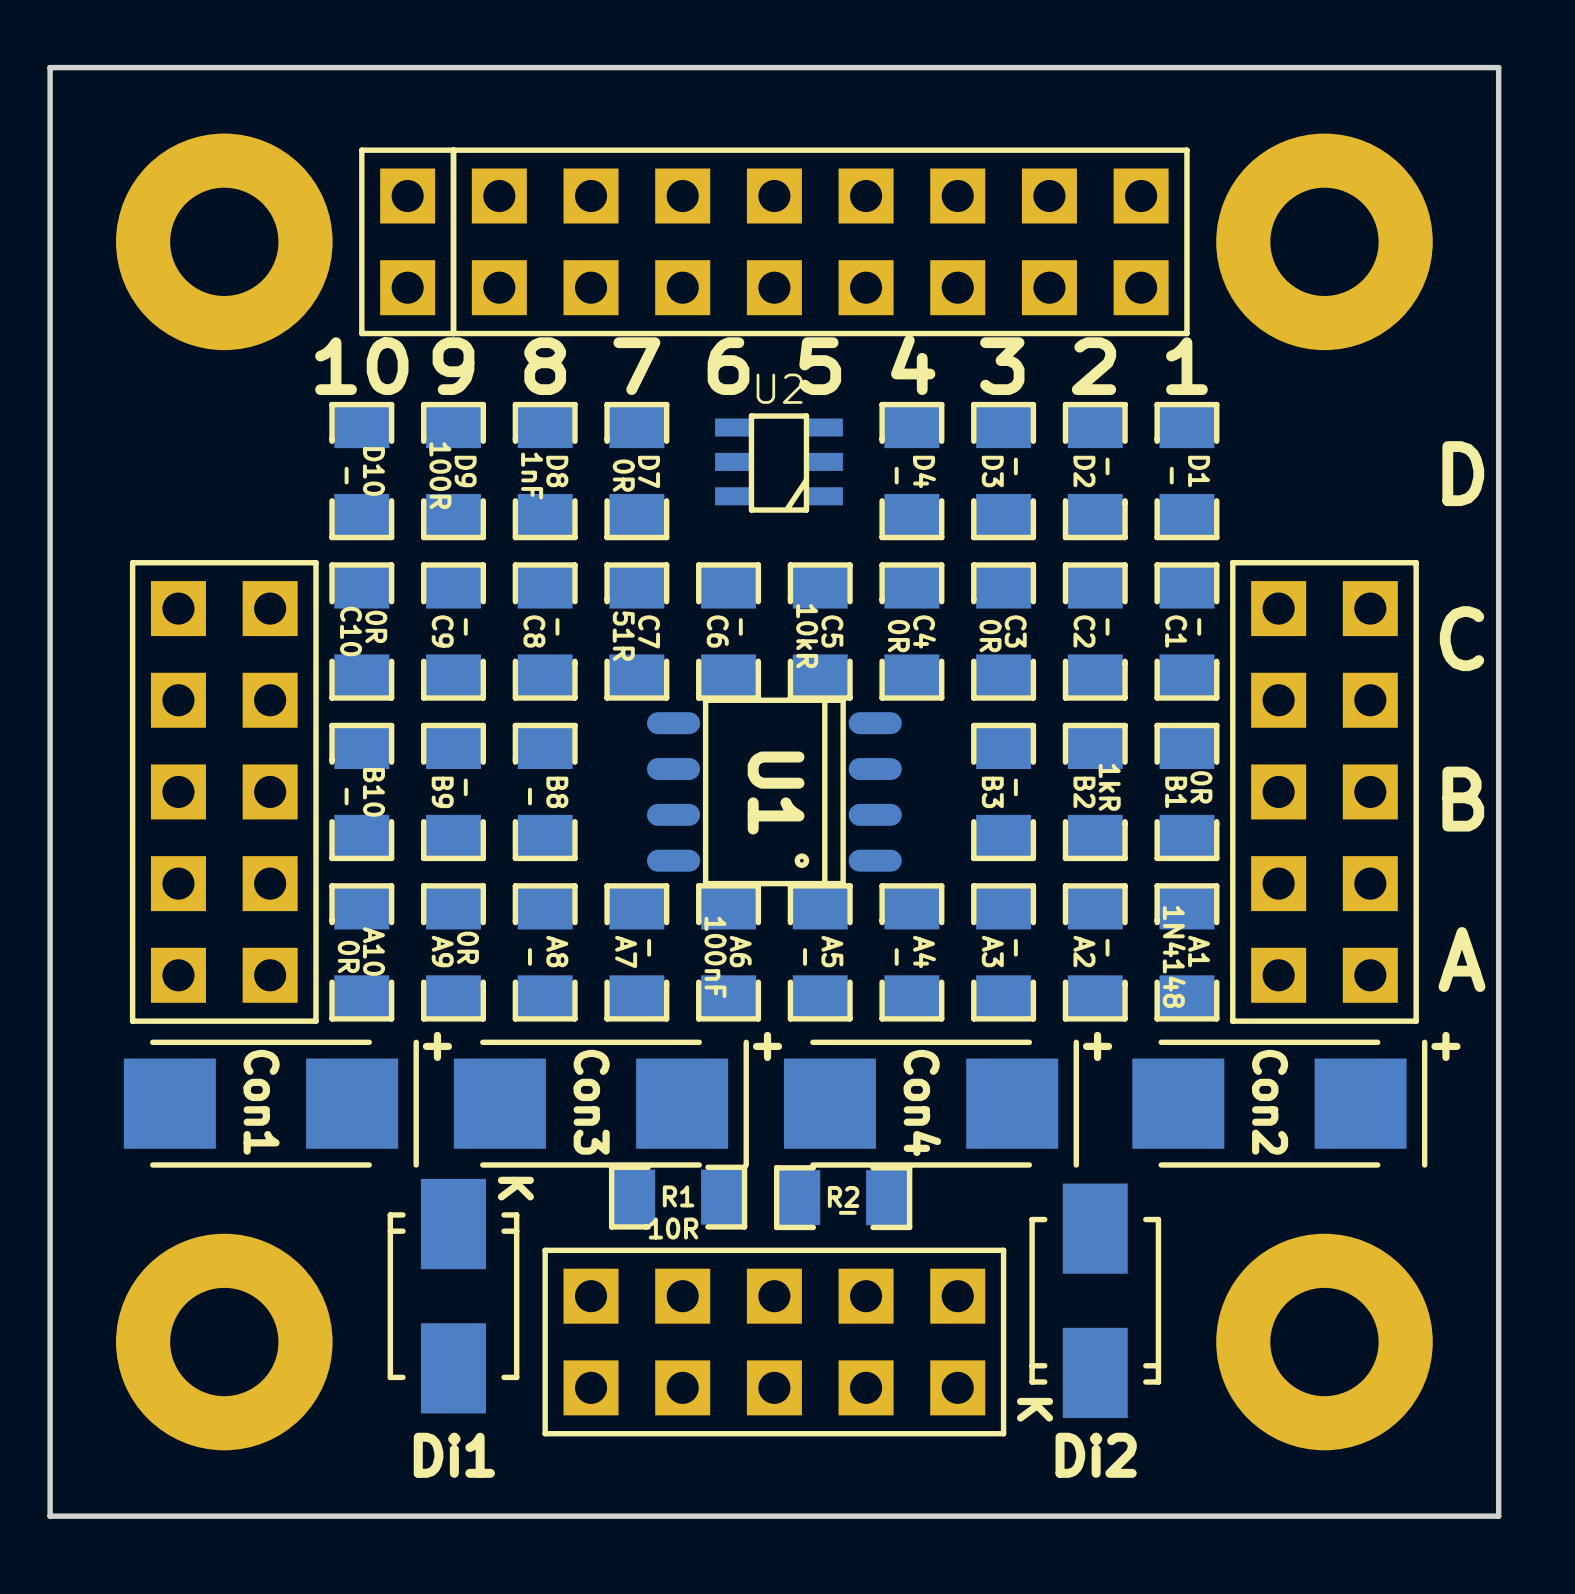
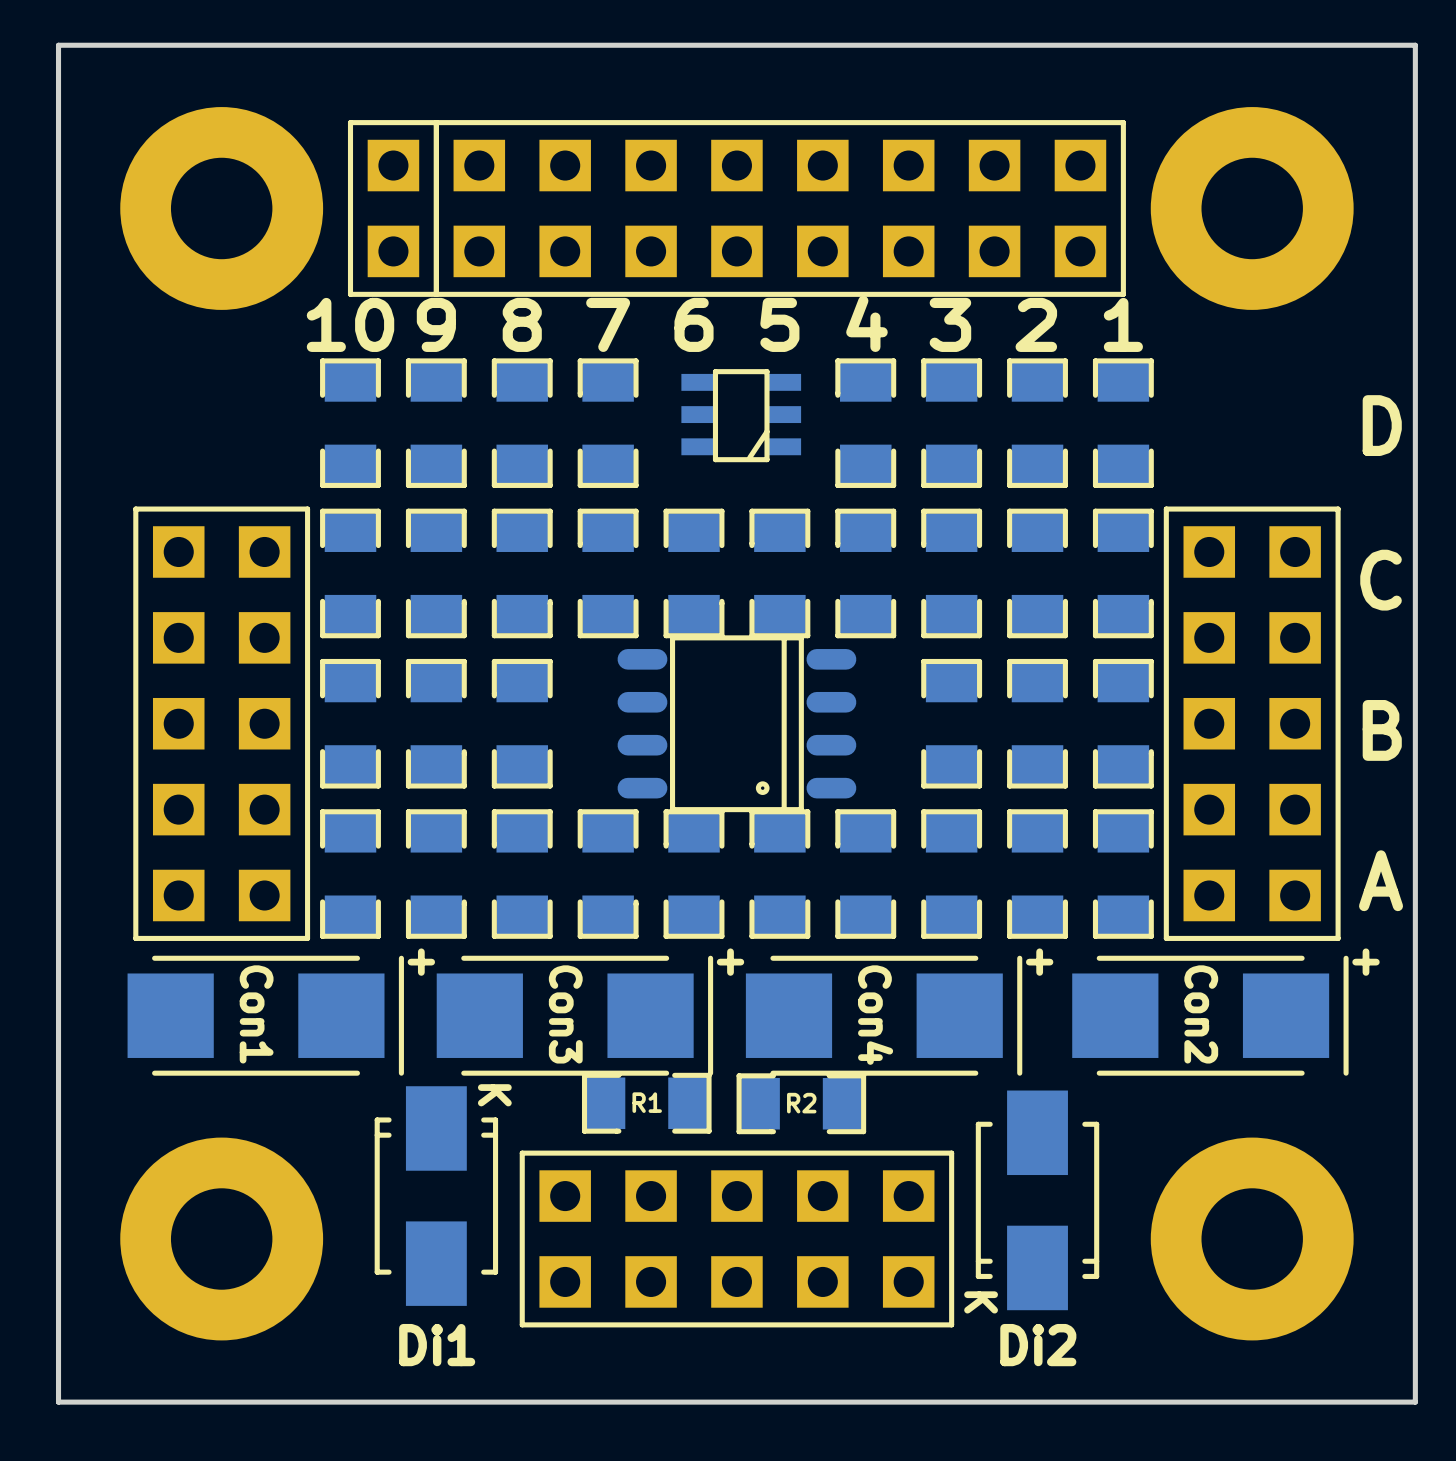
U2 name: U2 (779, 388) -> none
D3 value: - (1015, 466) -> none
D2 value: - (1107, 466) -> none
D10 name: D10 (373, 471) -> none
D9 name: D9 (465, 471) -> none
D8 name: D8 (557, 471) -> none
D7 name: D7 (649, 471) -> none
D4 name: D4 (924, 471) -> none
D3 name: D3 (992, 471) -> none
D2 name: D2 (1084, 471) -> none
D1 name: D1 (1199, 471) -> none
D10 value: - (346, 475) -> none
D9 value: 100R (440, 475) -> none
D7 value: 0R (623, 475) -> none
D4 value: - (896, 475) -> none
D1 value: - (1171, 475) -> none
D8 value: 1nF (532, 476) -> none
C10 value: 0R (376, 626) -> none
C9 value: - (465, 626) -> none
C8 value: - (557, 626) -> none
C6 value: - (740, 626) -> none
C2 value: - (1107, 626) -> none
C1 value: - (1199, 626) -> none
C10 name: C10 (351, 631) -> none
C9 name: C9 (442, 631) -> none
C8 name: C8 (534, 631) -> none
C7 name: C7 (649, 631) -> none
C6 name: C6 (717, 631) -> none
C5 name: C5 (832, 631) -> none
C4 name: C4 (924, 631) -> none
C3 name: C3 (1015, 631) -> none
C2 name: C2 (1084, 631) -> none
C1 name: C1 (1176, 631) -> none
C7 value: 51R (623, 636) -> none
C5 value: 10kR (807, 636) -> none
C4 value: 0R (898, 636) -> none
C3 value: 0R (990, 636) -> none
B9 value: - (465, 787) -> none
B3 value: - (1015, 787) -> none
B2 value: 1kR (1109, 787) -> none
B1 value: 0R (1201, 787) -> none
B10 name: B10 (373, 792) -> none
B9 name: B9 (442, 792) -> none
B8 name: B8 (557, 792) -> none
B3 name: B3 (992, 792) -> none
B2 name: B2 (1084, 792) -> none
B1 name: B1 (1176, 792) -> none
U1 name: U1 (776, 793) -> none
B10 value: - (346, 796) -> none
B8 value: - (529, 796) -> none
A9 value: 0R (467, 947) -> none
A7 value: - (649, 947) -> none
A3 value: - (1015, 947) -> none
A2 value: - (1107, 947) -> none
A10 name: A10 (373, 951) -> none
A9 name: A9 (442, 951) -> none
A8 name: A8 (557, 951) -> none
A7 name: A7 (626, 951) -> none
A6 name: A6 (740, 951) -> none
A5 name: A5 (832, 951) -> none
A4 name: A4 (924, 951) -> none
A3 name: A3 (992, 951) -> none
A2 name: A2 (1084, 951) -> none
A1 name: A1 (1199, 951) -> none
A10 value: 0R (348, 956) -> none
A8 value: - (529, 956) -> none
A5 value: - (805, 956) -> none
A4 value: - (896, 956) -> none
A1 value: 1N4148 (1174, 956) -> none
A6 value: 100nF (715, 957) -> none
R2 value: - (847, 1212) -> none
R1 value: 10R (673, 1228) -> none

